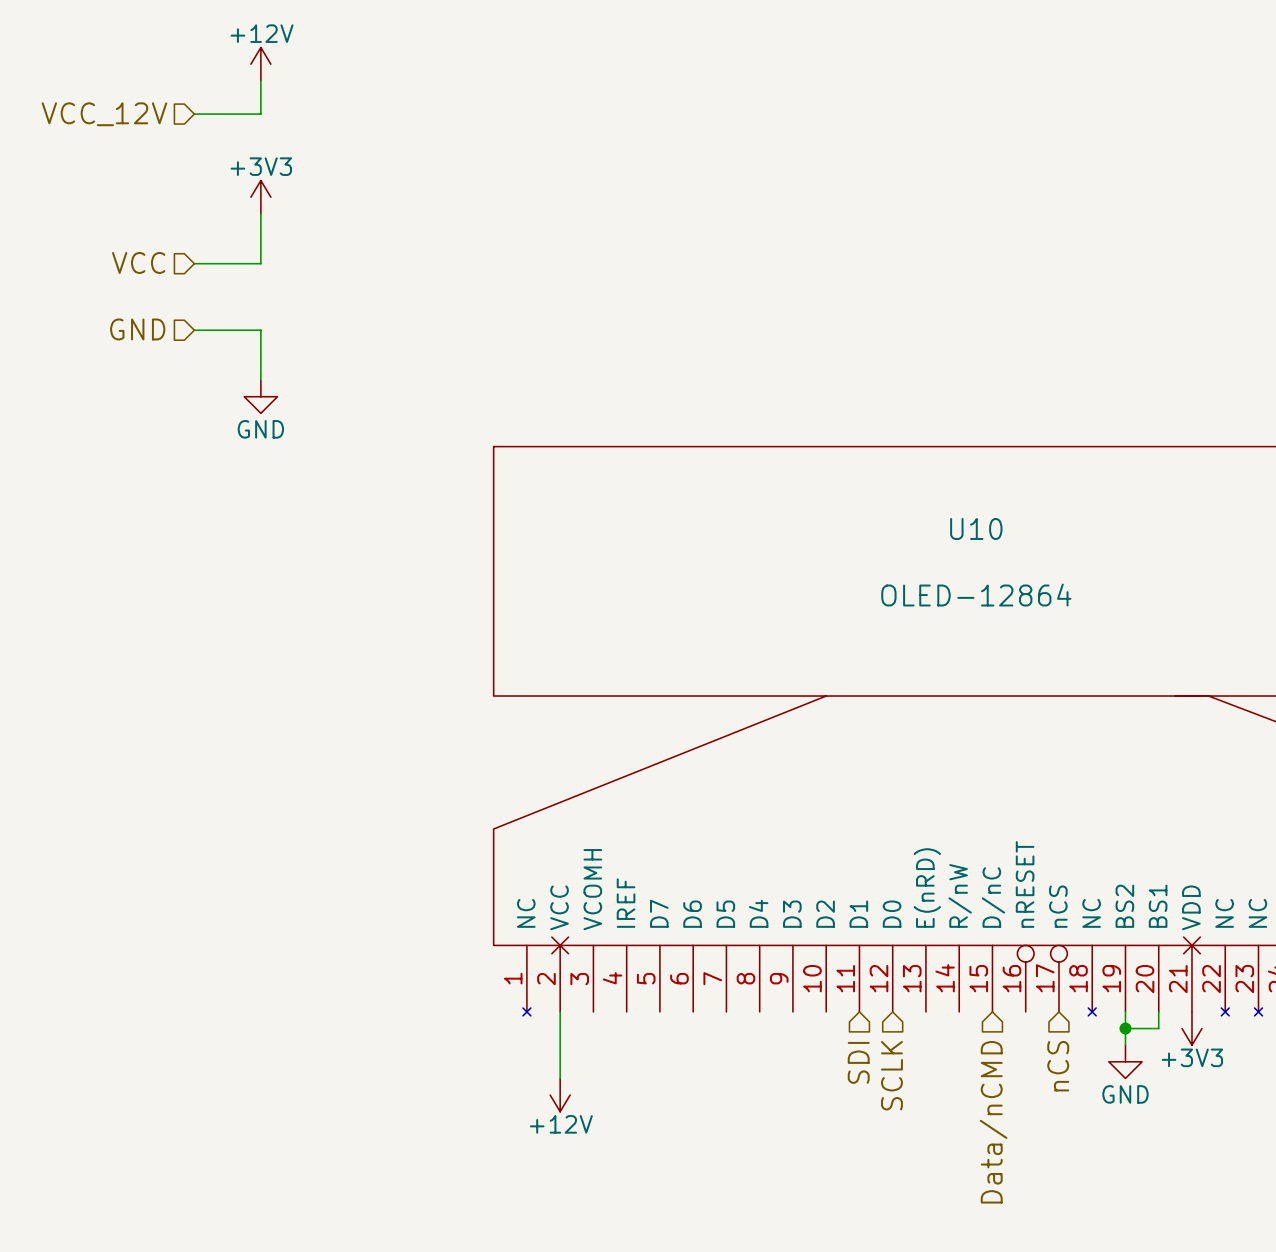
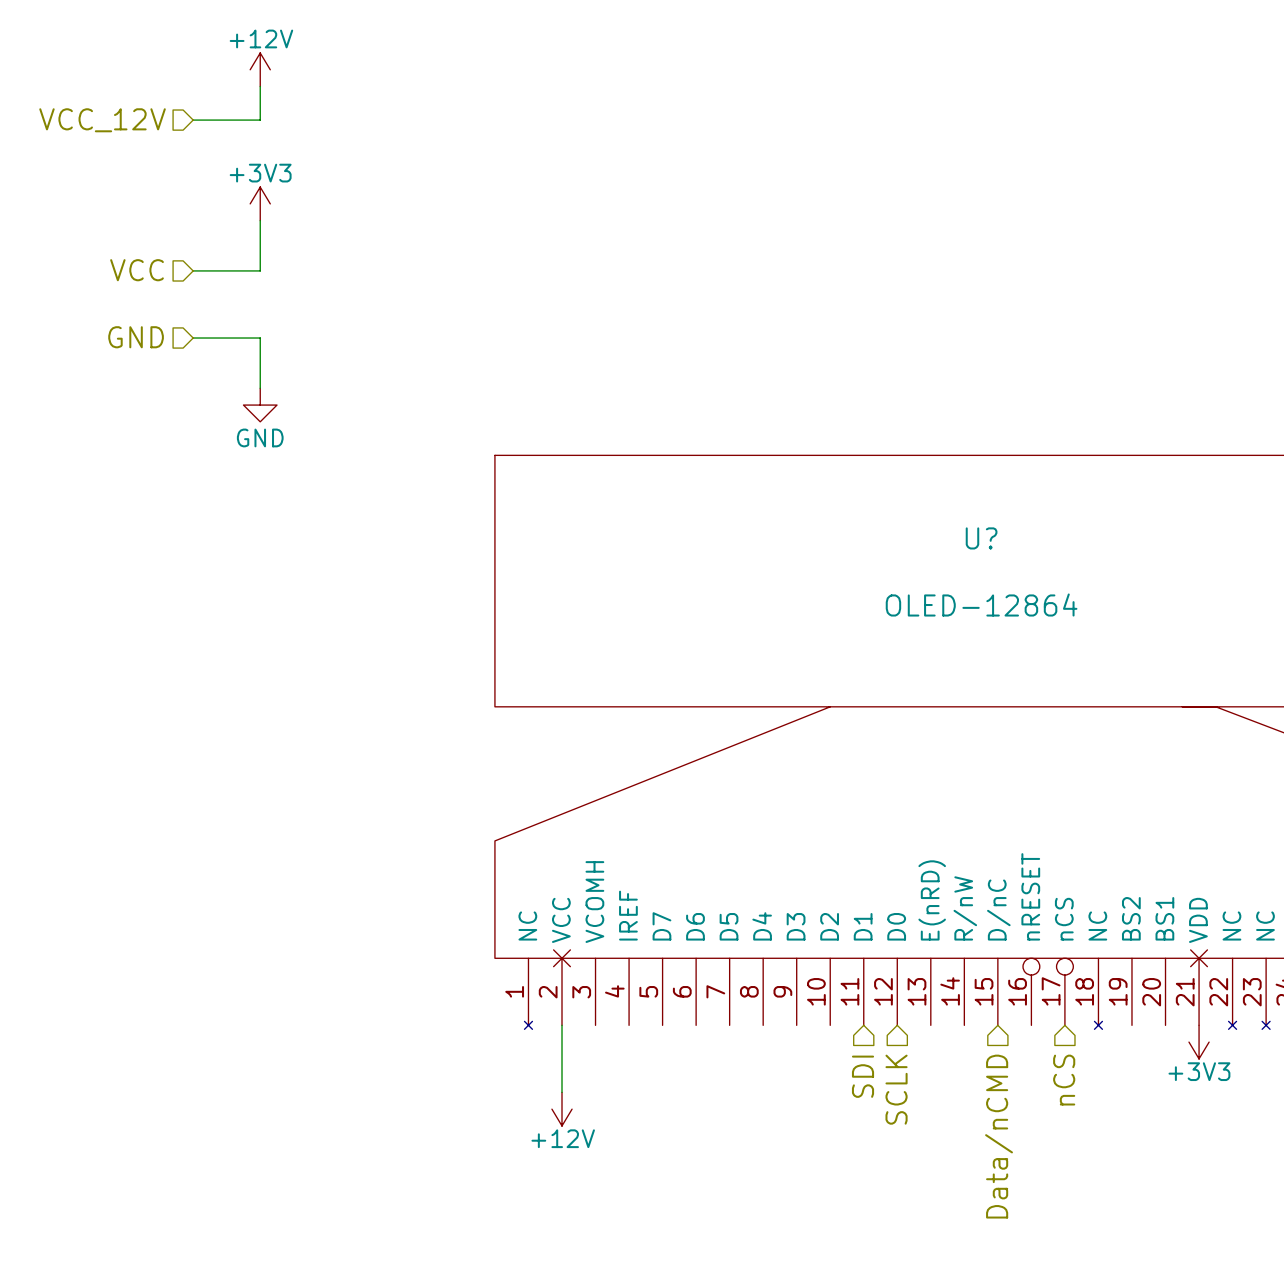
U10 name: U10 (976, 528) -> U? (981, 538)
wire: (1125, 1011) (1125, 1045) -> none
wire: (1158, 1011) (1158, 1028) (1125, 1028) -> none
junction: (1125, 1028) -> none
power symbol: GND (1125, 1061) -> none

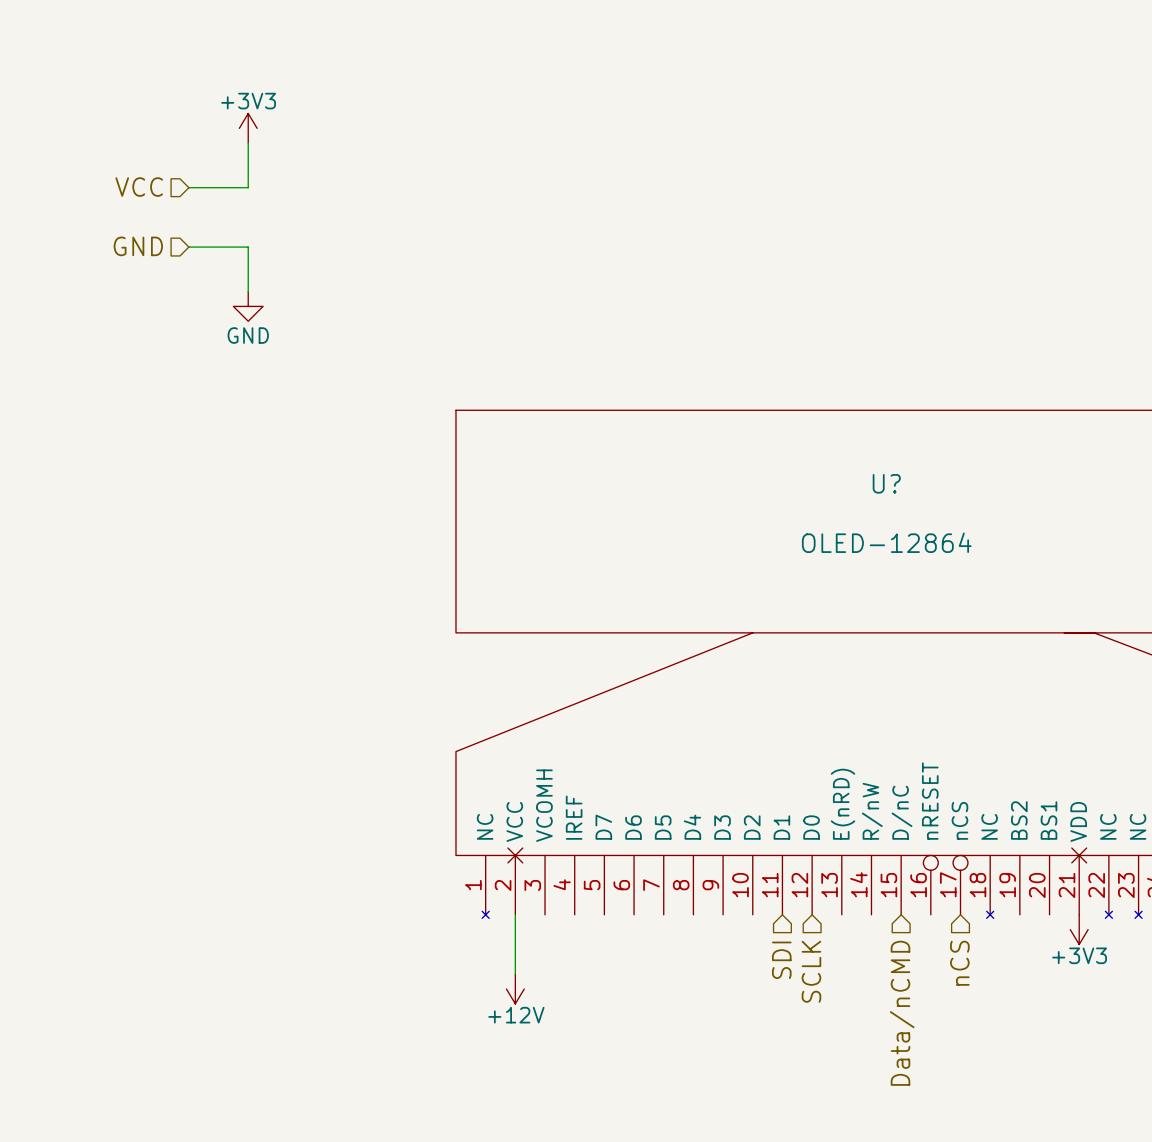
power symbol: +12V (260, 69) -> none
wire: (260, 86) (260, 120) (193, 120) -> none
hierarchical label: VCC_12V (102, 120) -> none
wire: none -> (248, 143) (248, 187) (188, 187)
hierarchical label: none -> VCC (139, 187)
power symbol position: +3V3 (260, 203) -> +3V3 (248, 128)
wire: (260, 220) (260, 270) -> (248, 291) (248, 247)
hierarchical label: VCC (137, 270) -> GND (138, 246)
hierarchical label: GND (136, 337) -> none
wire: (193, 338) (260, 338) (260, 388) -> none
power symbol position: GND (260, 405) -> GND (248, 306)

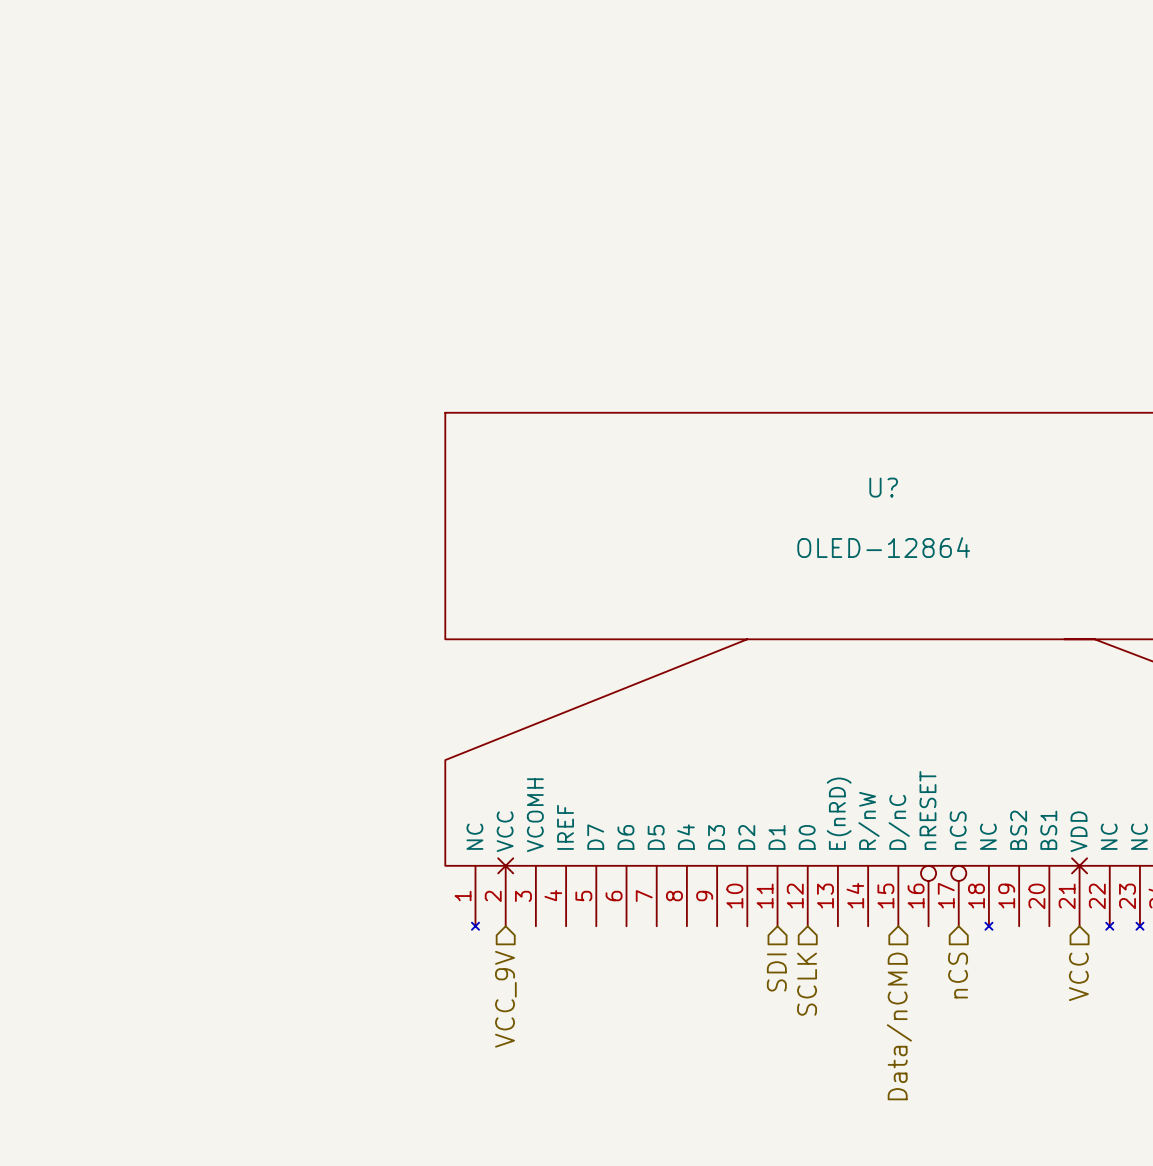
power symbol: +3V3 (248, 128) -> none
wire: (248, 143) (248, 187) (188, 187) -> none
hierarchical label: VCC (139, 187) -> none
hierarchical label: GND (138, 246) -> none
wire: (188, 247) (248, 247) (248, 291) -> none
power symbol: GND (248, 306) -> none
wire: (515, 914) (515, 974) -> none
power symbol: +3V3 (1079, 929) -> none
hierarchical label: none -> VCC (1078, 976)
hierarchical label: none -> VCC_9V (505, 999)
power symbol: +12V (515, 989) -> none

